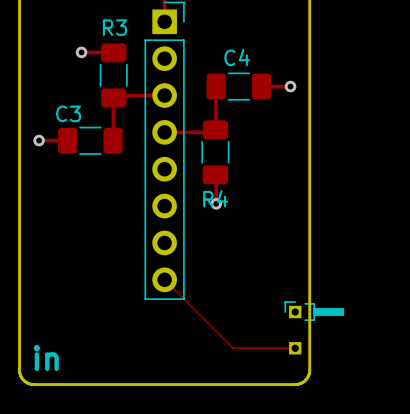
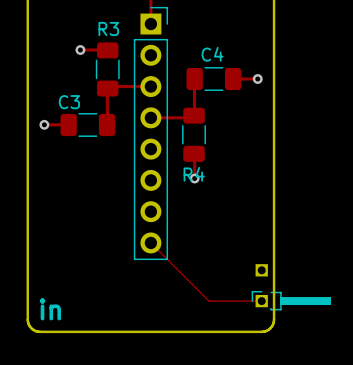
part: (314, 311) -> none
part: none -> (261, 270)
part: none -> (291, 300)
part: (295, 348) -> none

